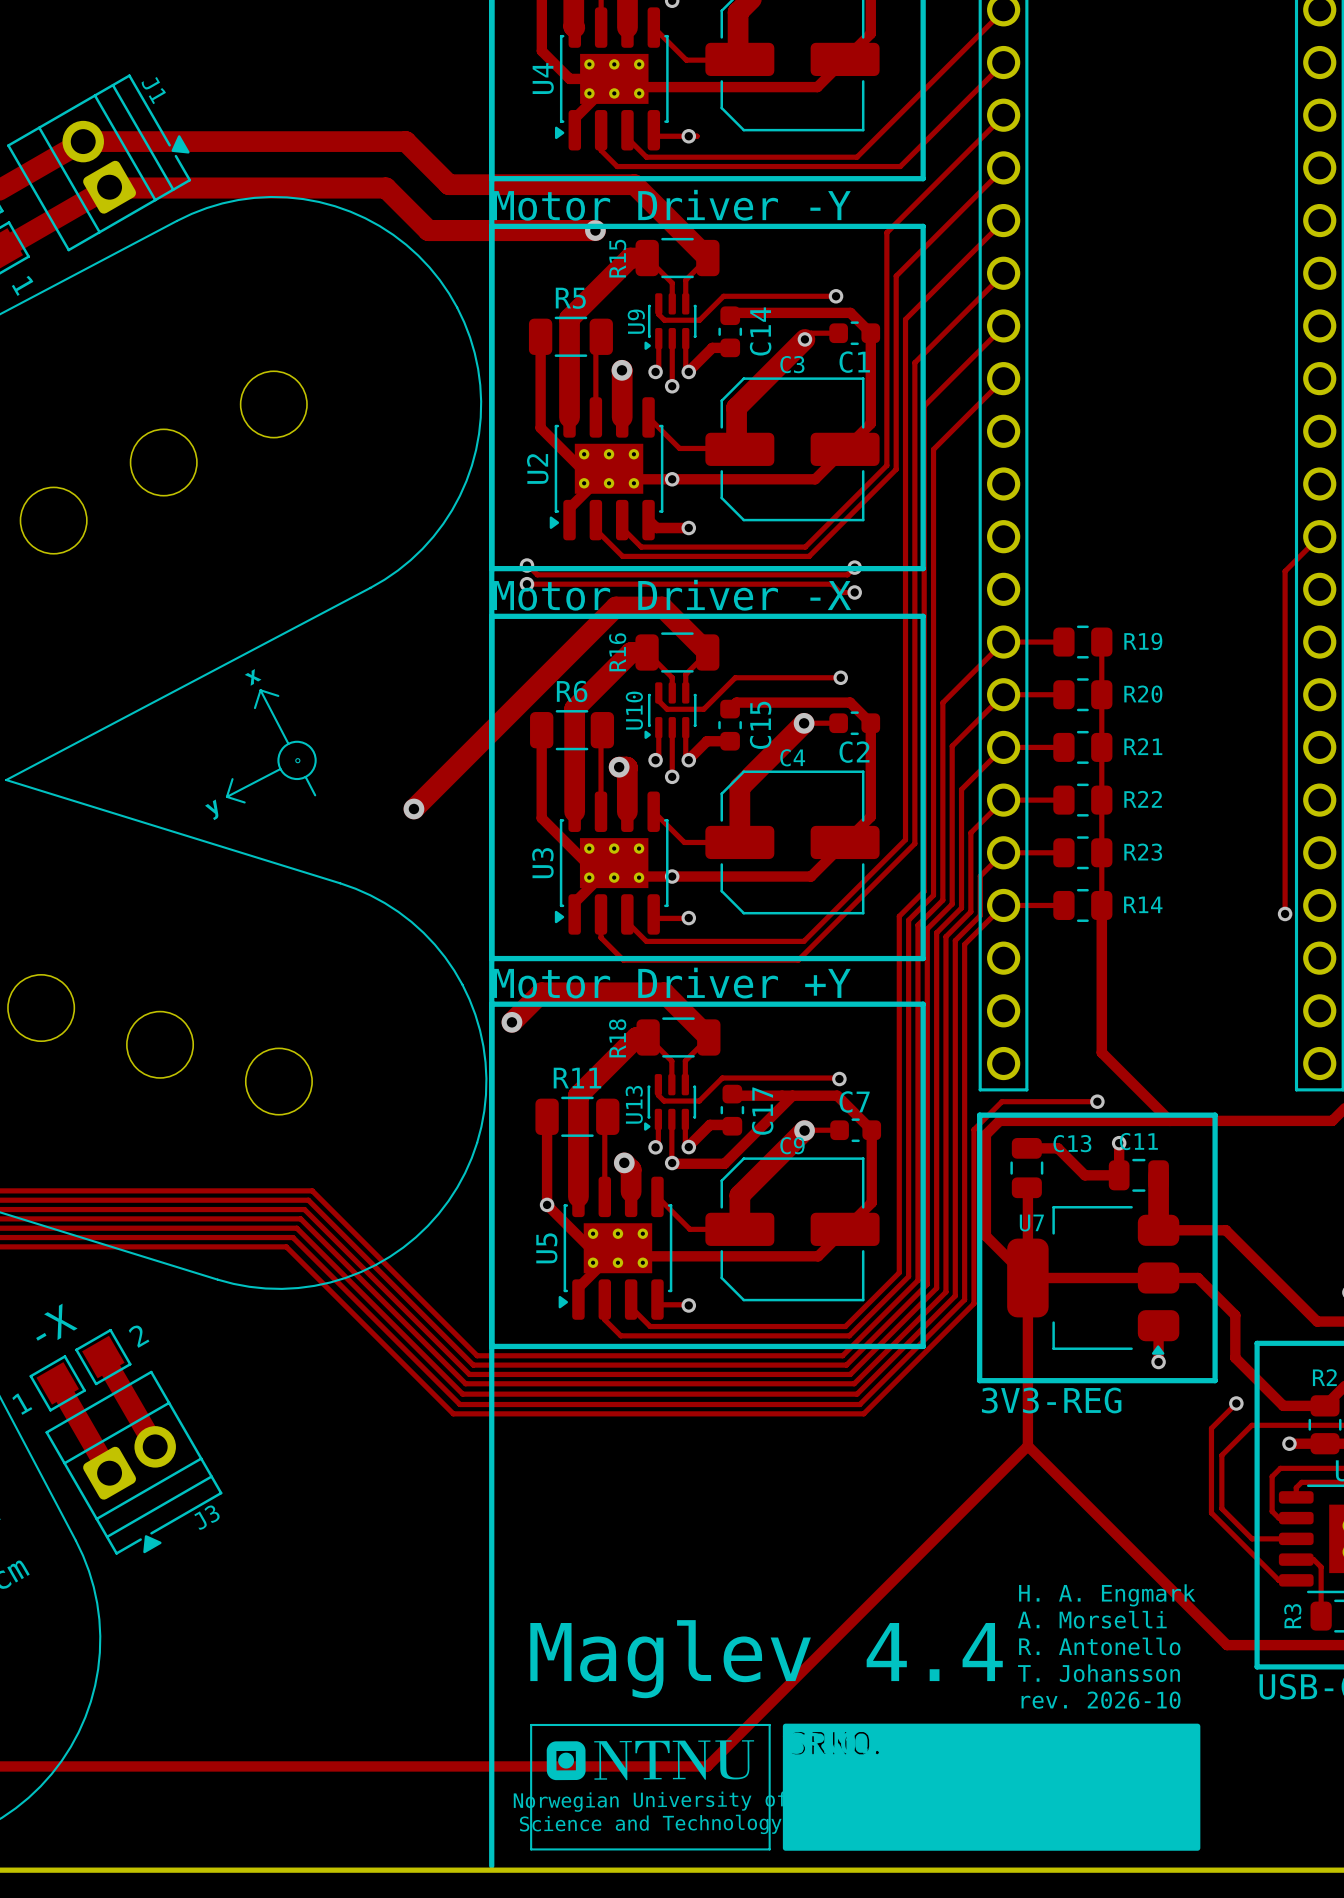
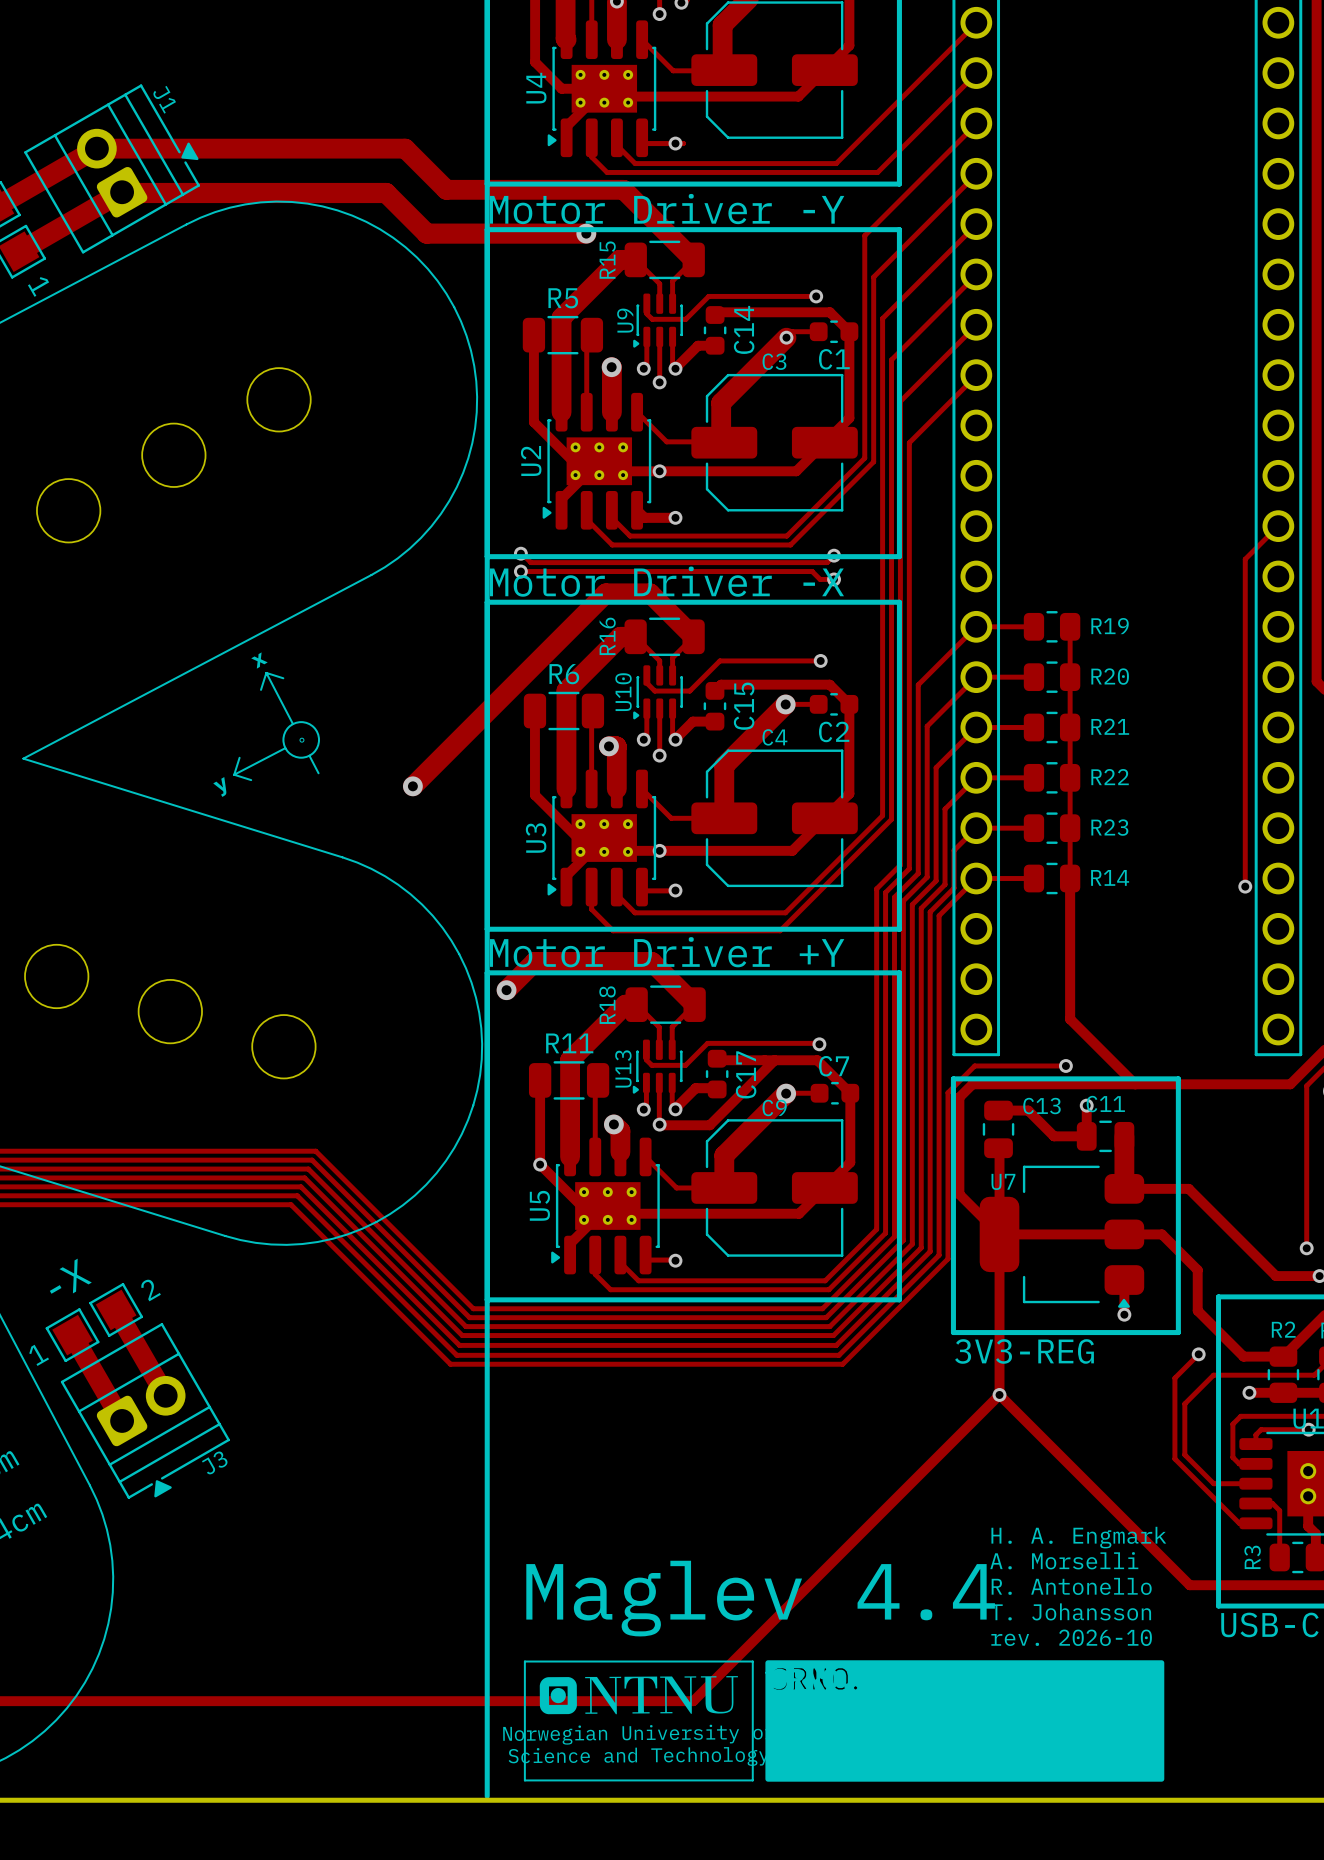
via: none -> (999, 1394)

